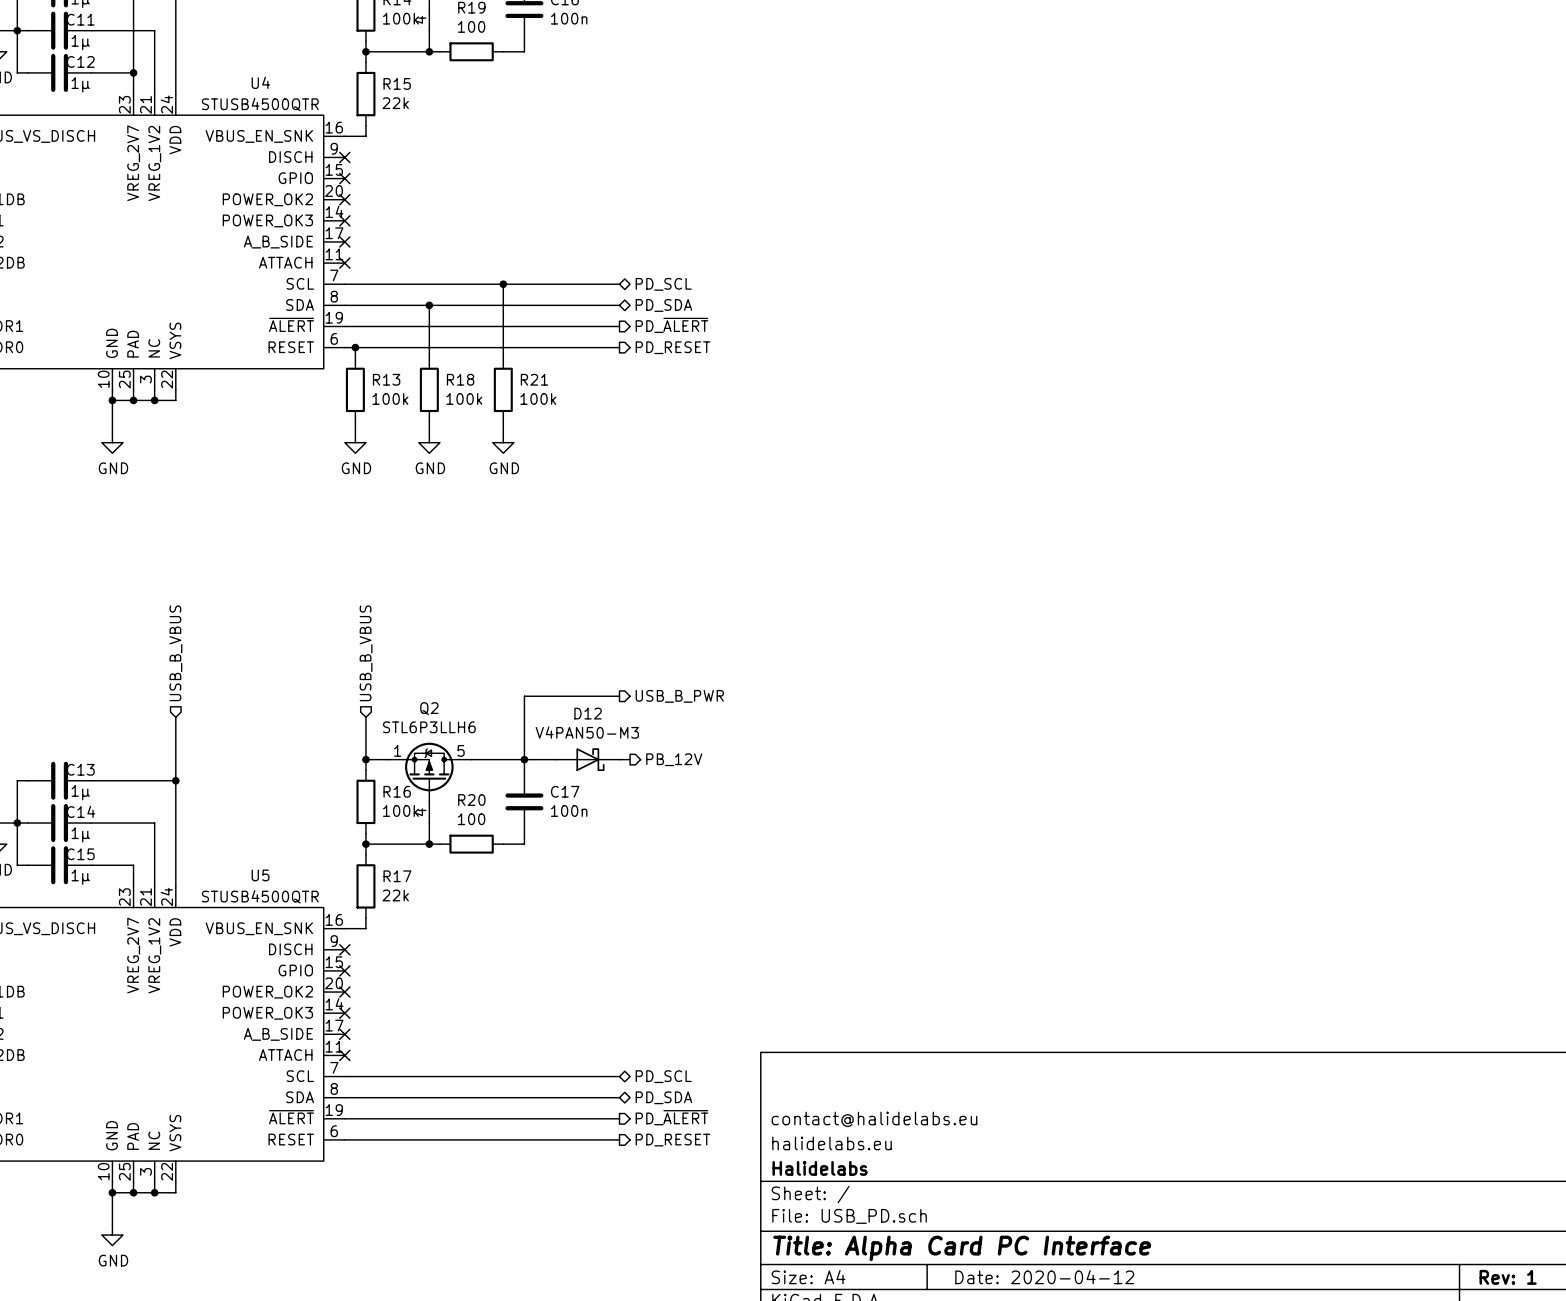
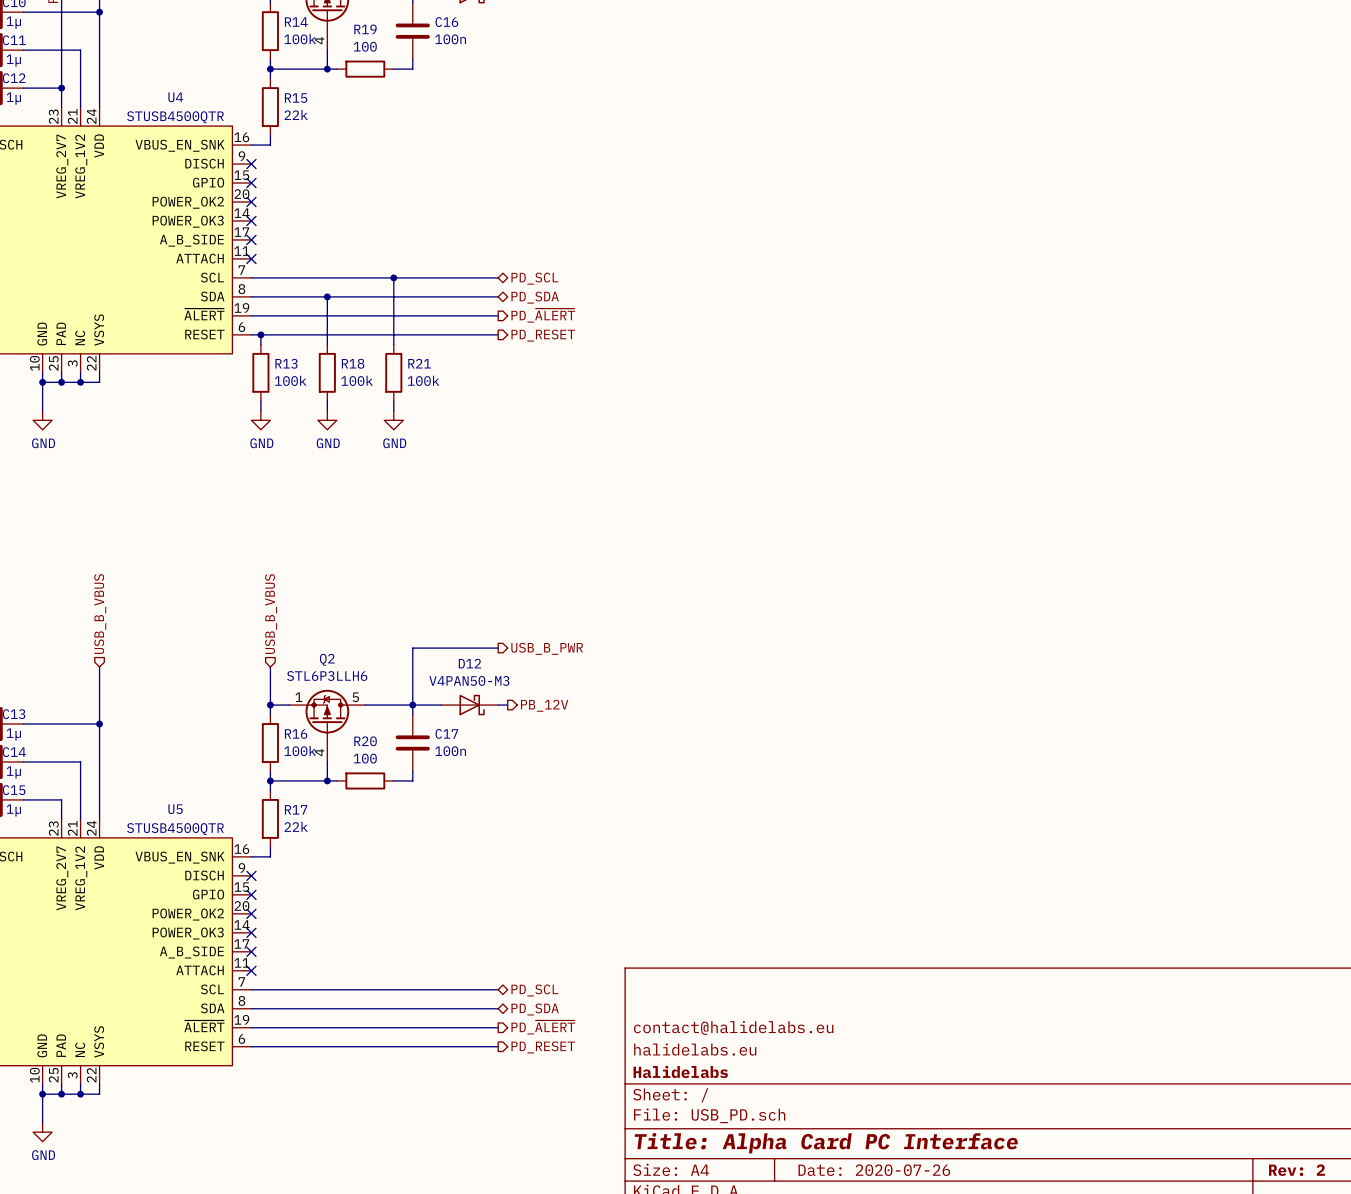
title block: Date: 2020-04-12 (1044, 1277) -> Date: 2020-07-26 (874, 1170)
title block: Rev: 1 (1508, 1277) -> Rev: 2 (1296, 1170)

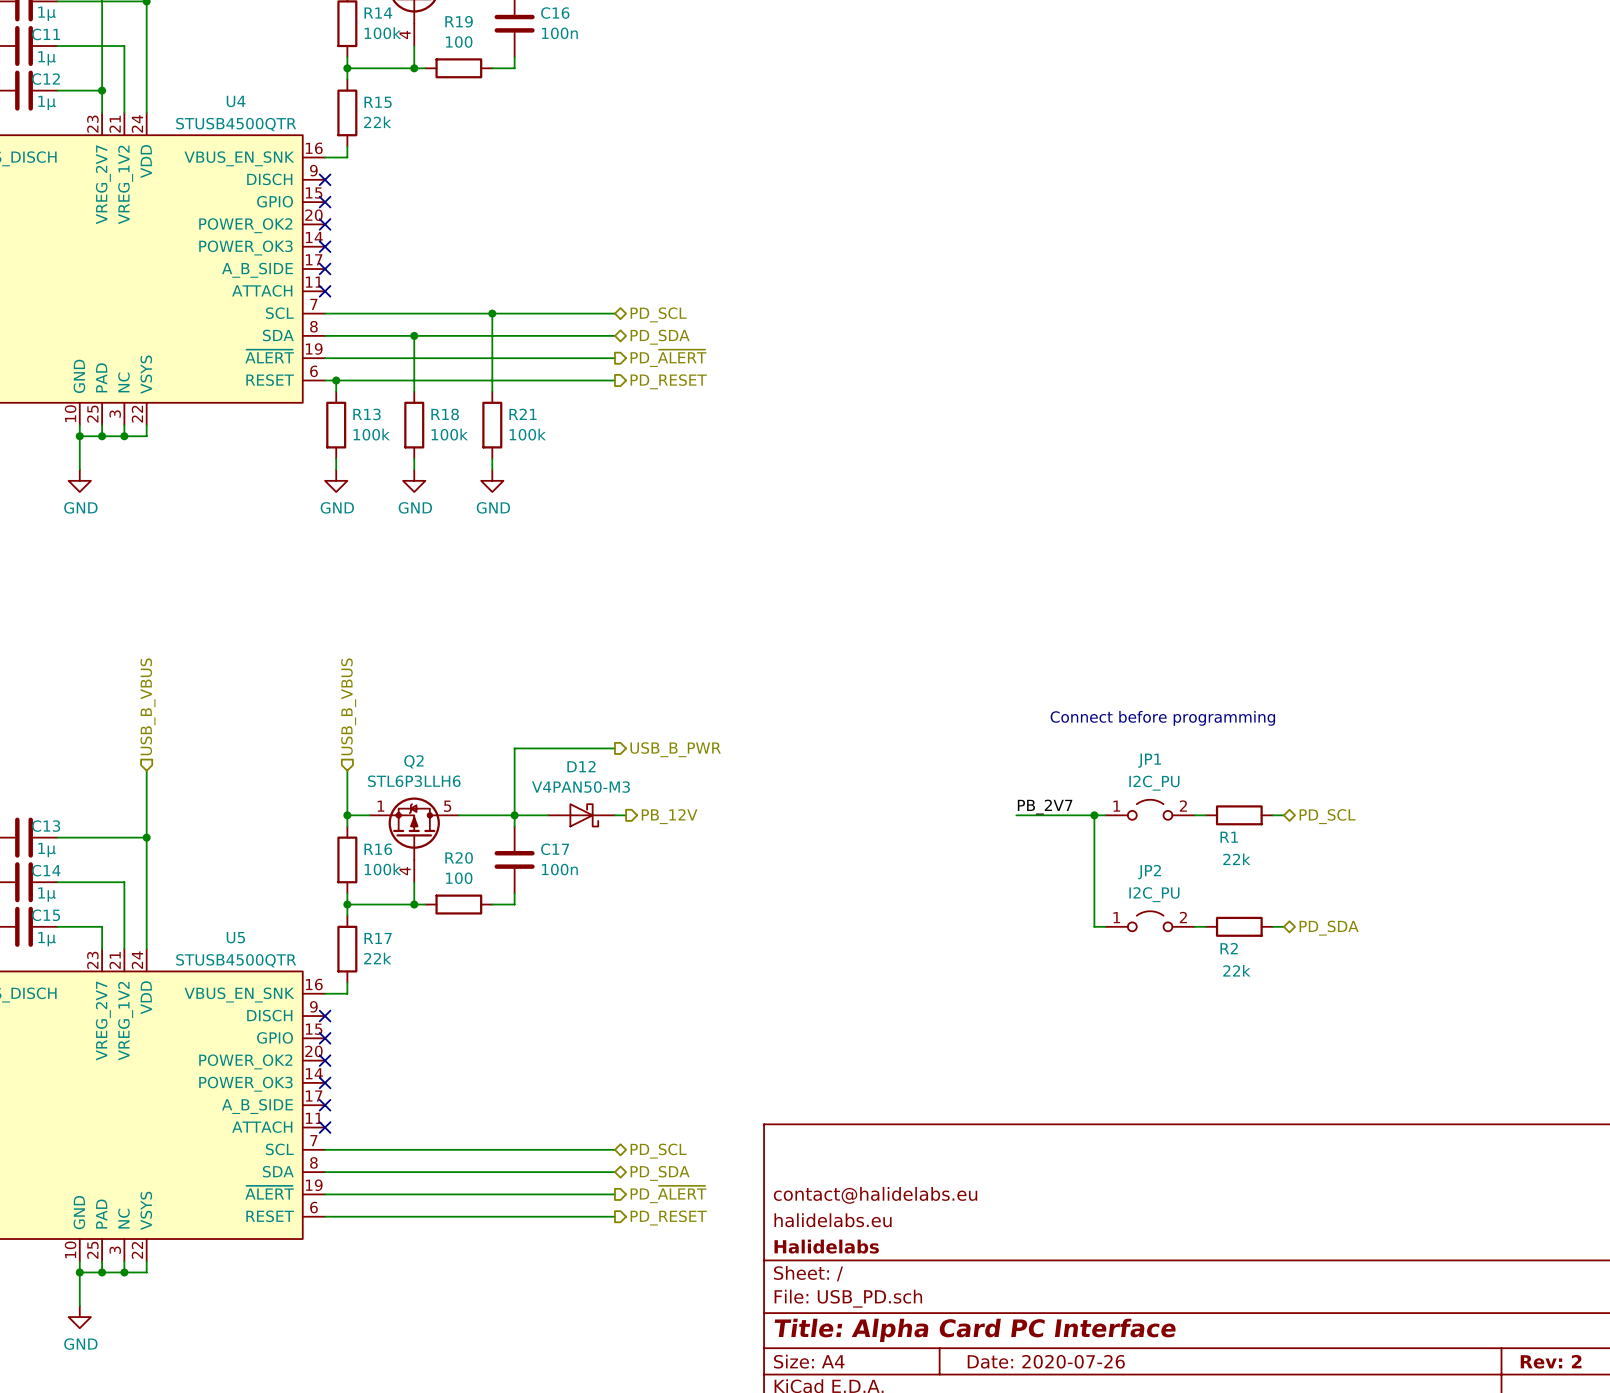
text: none -> Connect before programming (1162, 718)
label: none -> PB_2V7 (1045, 807)
JP1: none -> I2C_PU (1150, 809)
wire: none -> (1016, 815) (1105, 815)
wire: none -> (1094, 815) (1094, 926) (1105, 926)
junction: none -> (1094, 815)
wire: none -> (1194, 815) (1205, 815)
R1: none -> 22k (1239, 815)
wire: none -> (1272, 815) (1283, 815)
hierarchical label: none -> PD_SCL (1327, 816)
JP2: none -> I2C_PU (1150, 921)
wire: none -> (1194, 926) (1205, 926)
R2: none -> 22k (1239, 926)
wire: none -> (1272, 926) (1283, 926)
hierarchical label: none -> PD_SDA (1329, 928)

